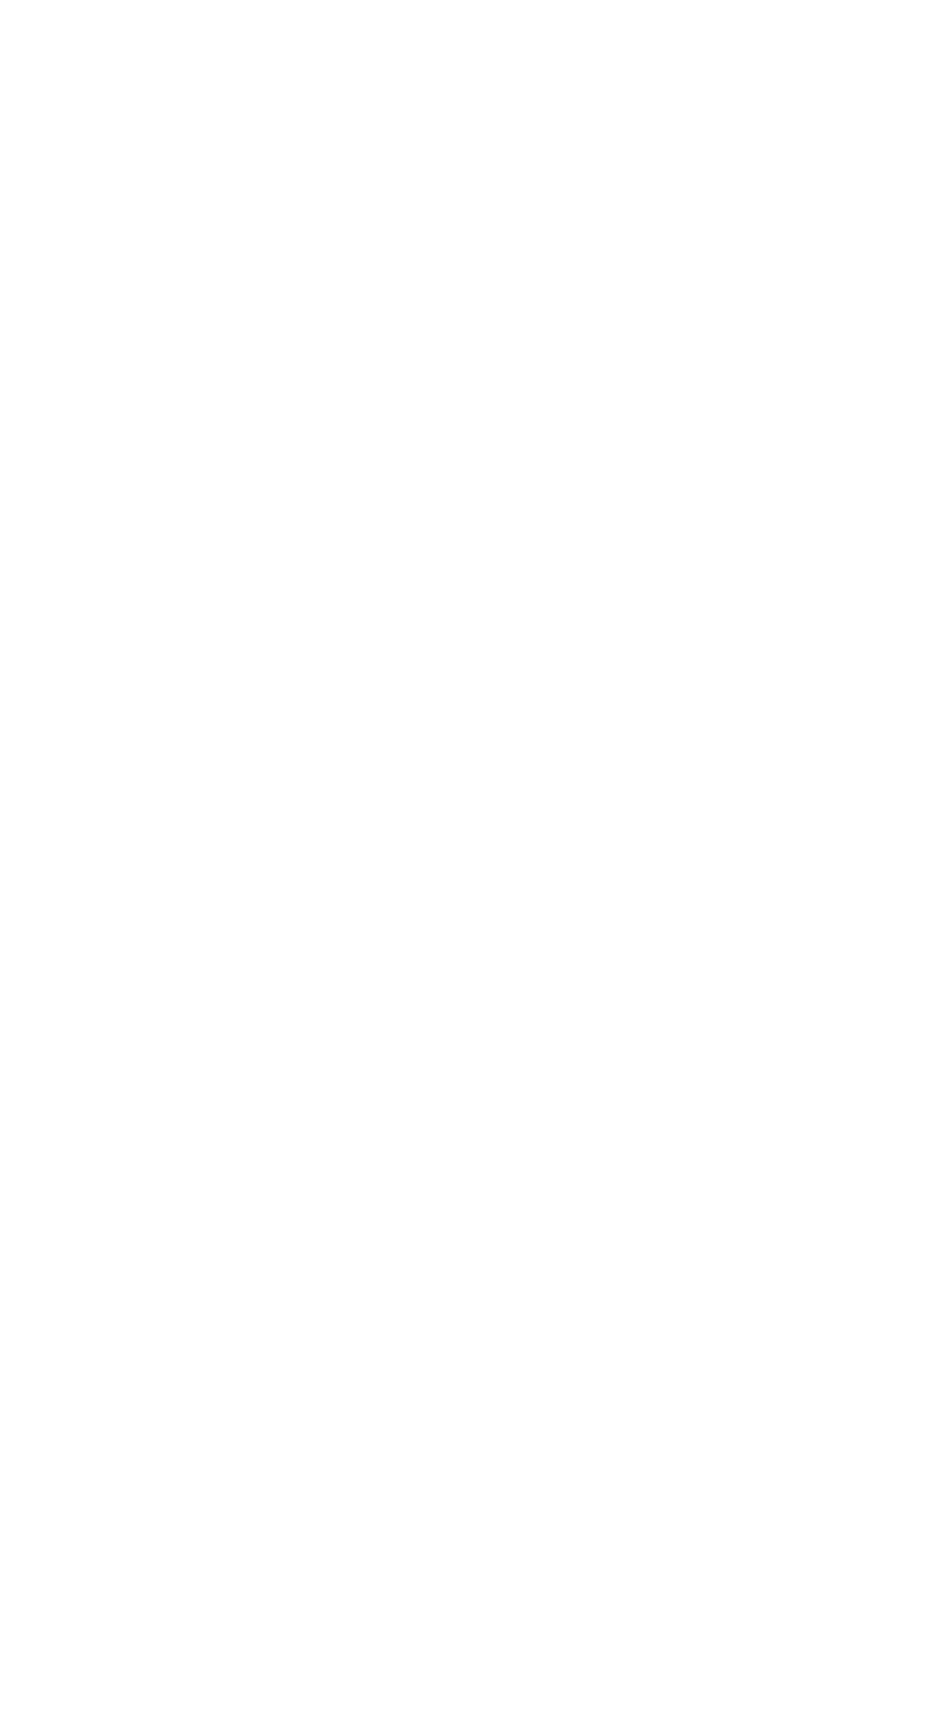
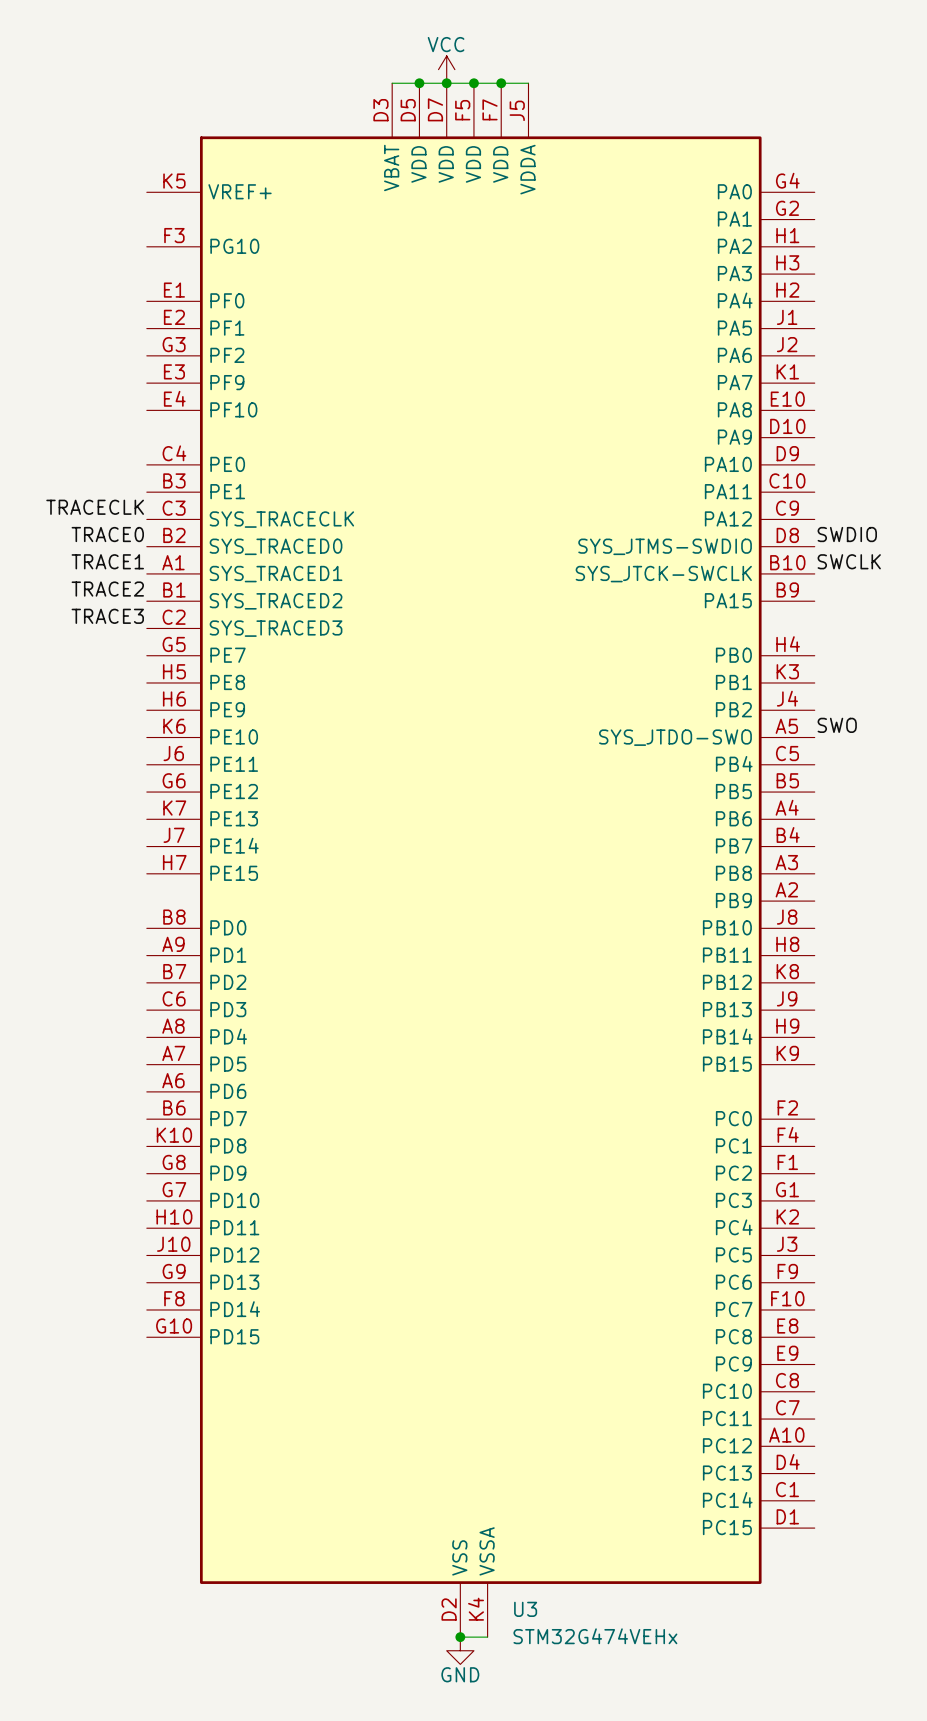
power symbol: none -> VCC (446, 69)
wire: none -> (392, 83) (528, 83)
junction: none -> (419, 83)
junction: none -> (446, 83)
junction: none -> (473, 83)
junction: none -> (501, 83)
label: none -> TRACECLK (95, 507)
label: none -> TRACE0 (107, 534)
label: none -> SWDIO (847, 534)
label: none -> TRACE1 (107, 561)
label: none -> SWCLK (849, 561)
label: none -> TRACE2 (107, 589)
label: none -> TRACE3 (107, 616)
label: none -> SWO (837, 725)
U3: none -> STM32G474VEHx (480, 860)
wire: none -> (460, 1637) (487, 1637)
junction: none -> (460, 1637)
power symbol: none -> GND (460, 1650)

